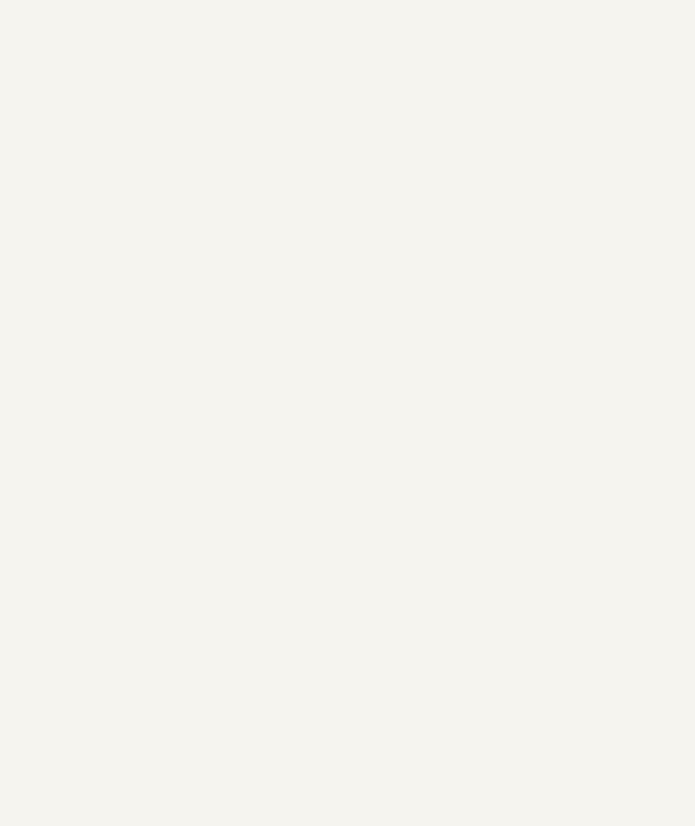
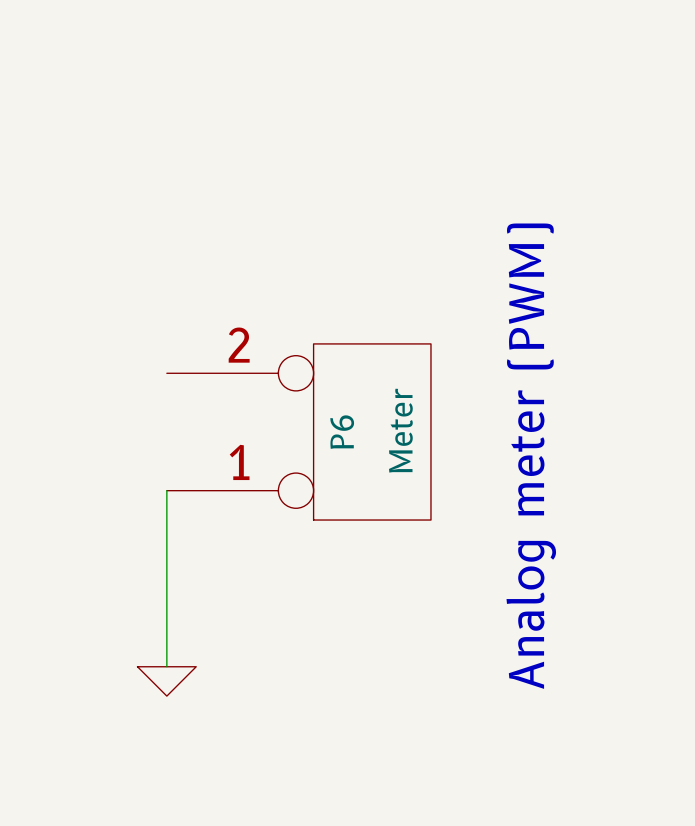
P6: none -> Meter (298, 431)
text: none -> Analog meter (PWM) (531, 456)
wire: none -> (166, 490) (166, 666)
power symbol: none -> (166, 681)

